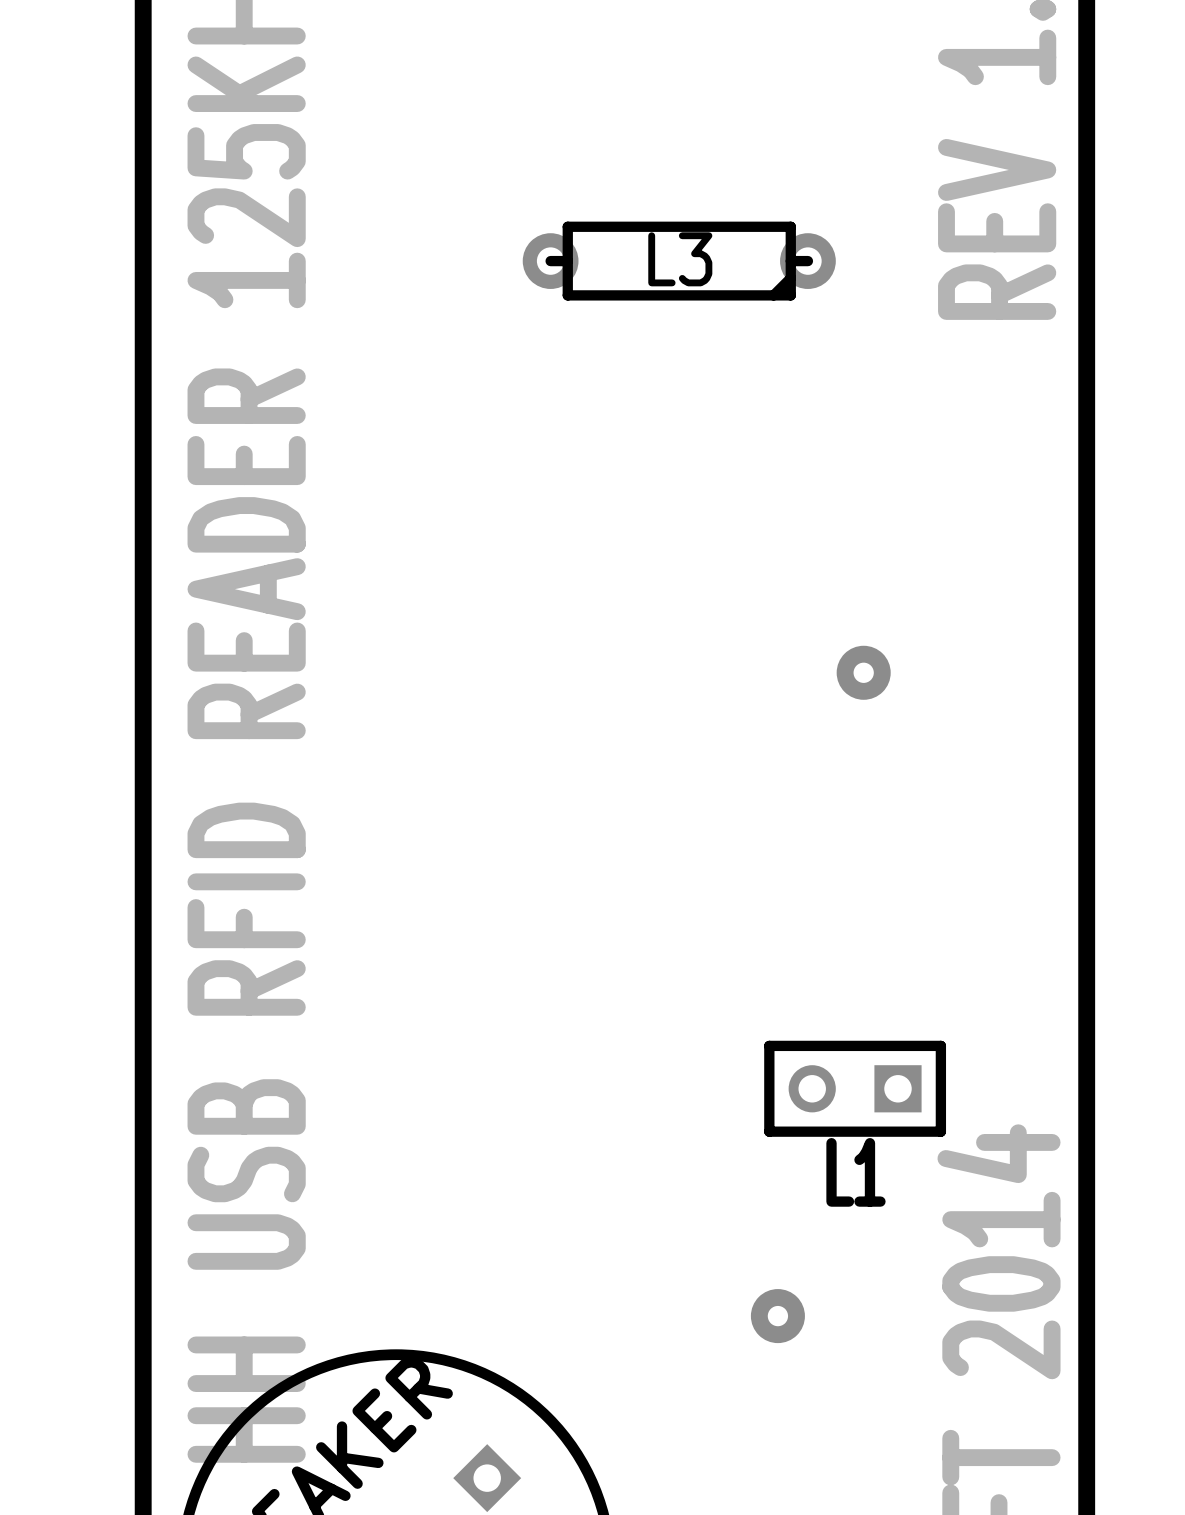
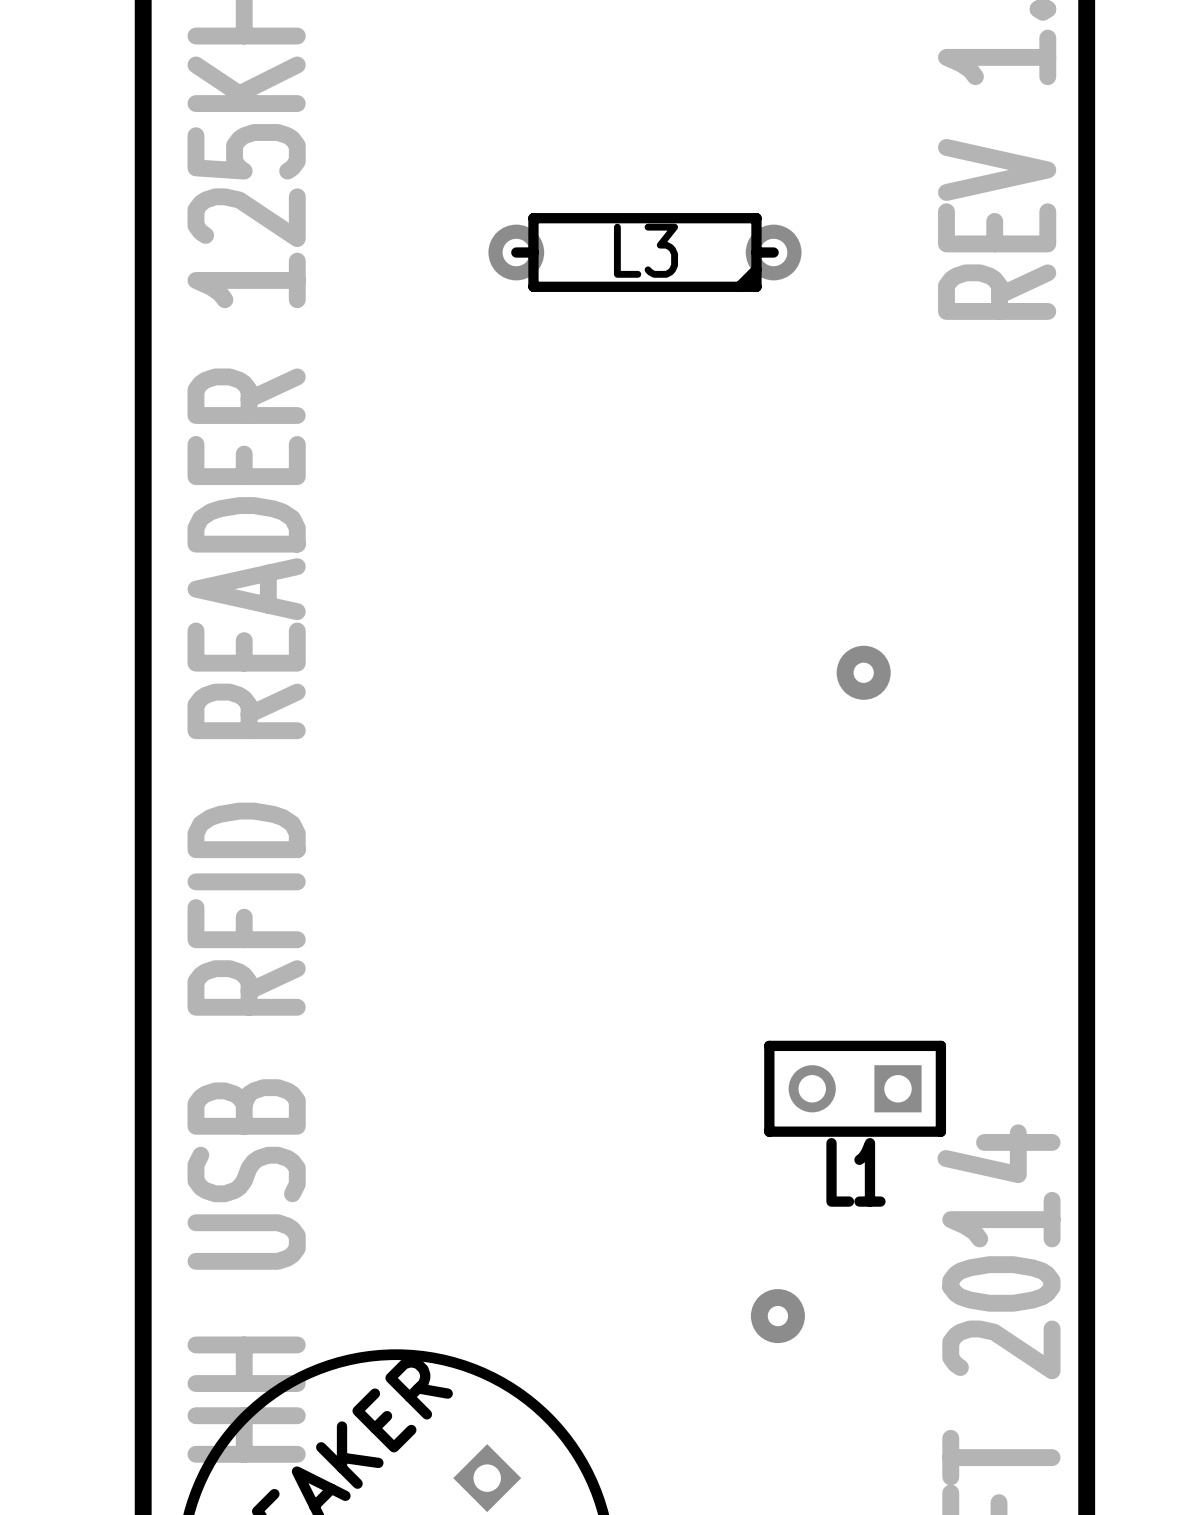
L3 position: (679, 261) -> (644, 252)

